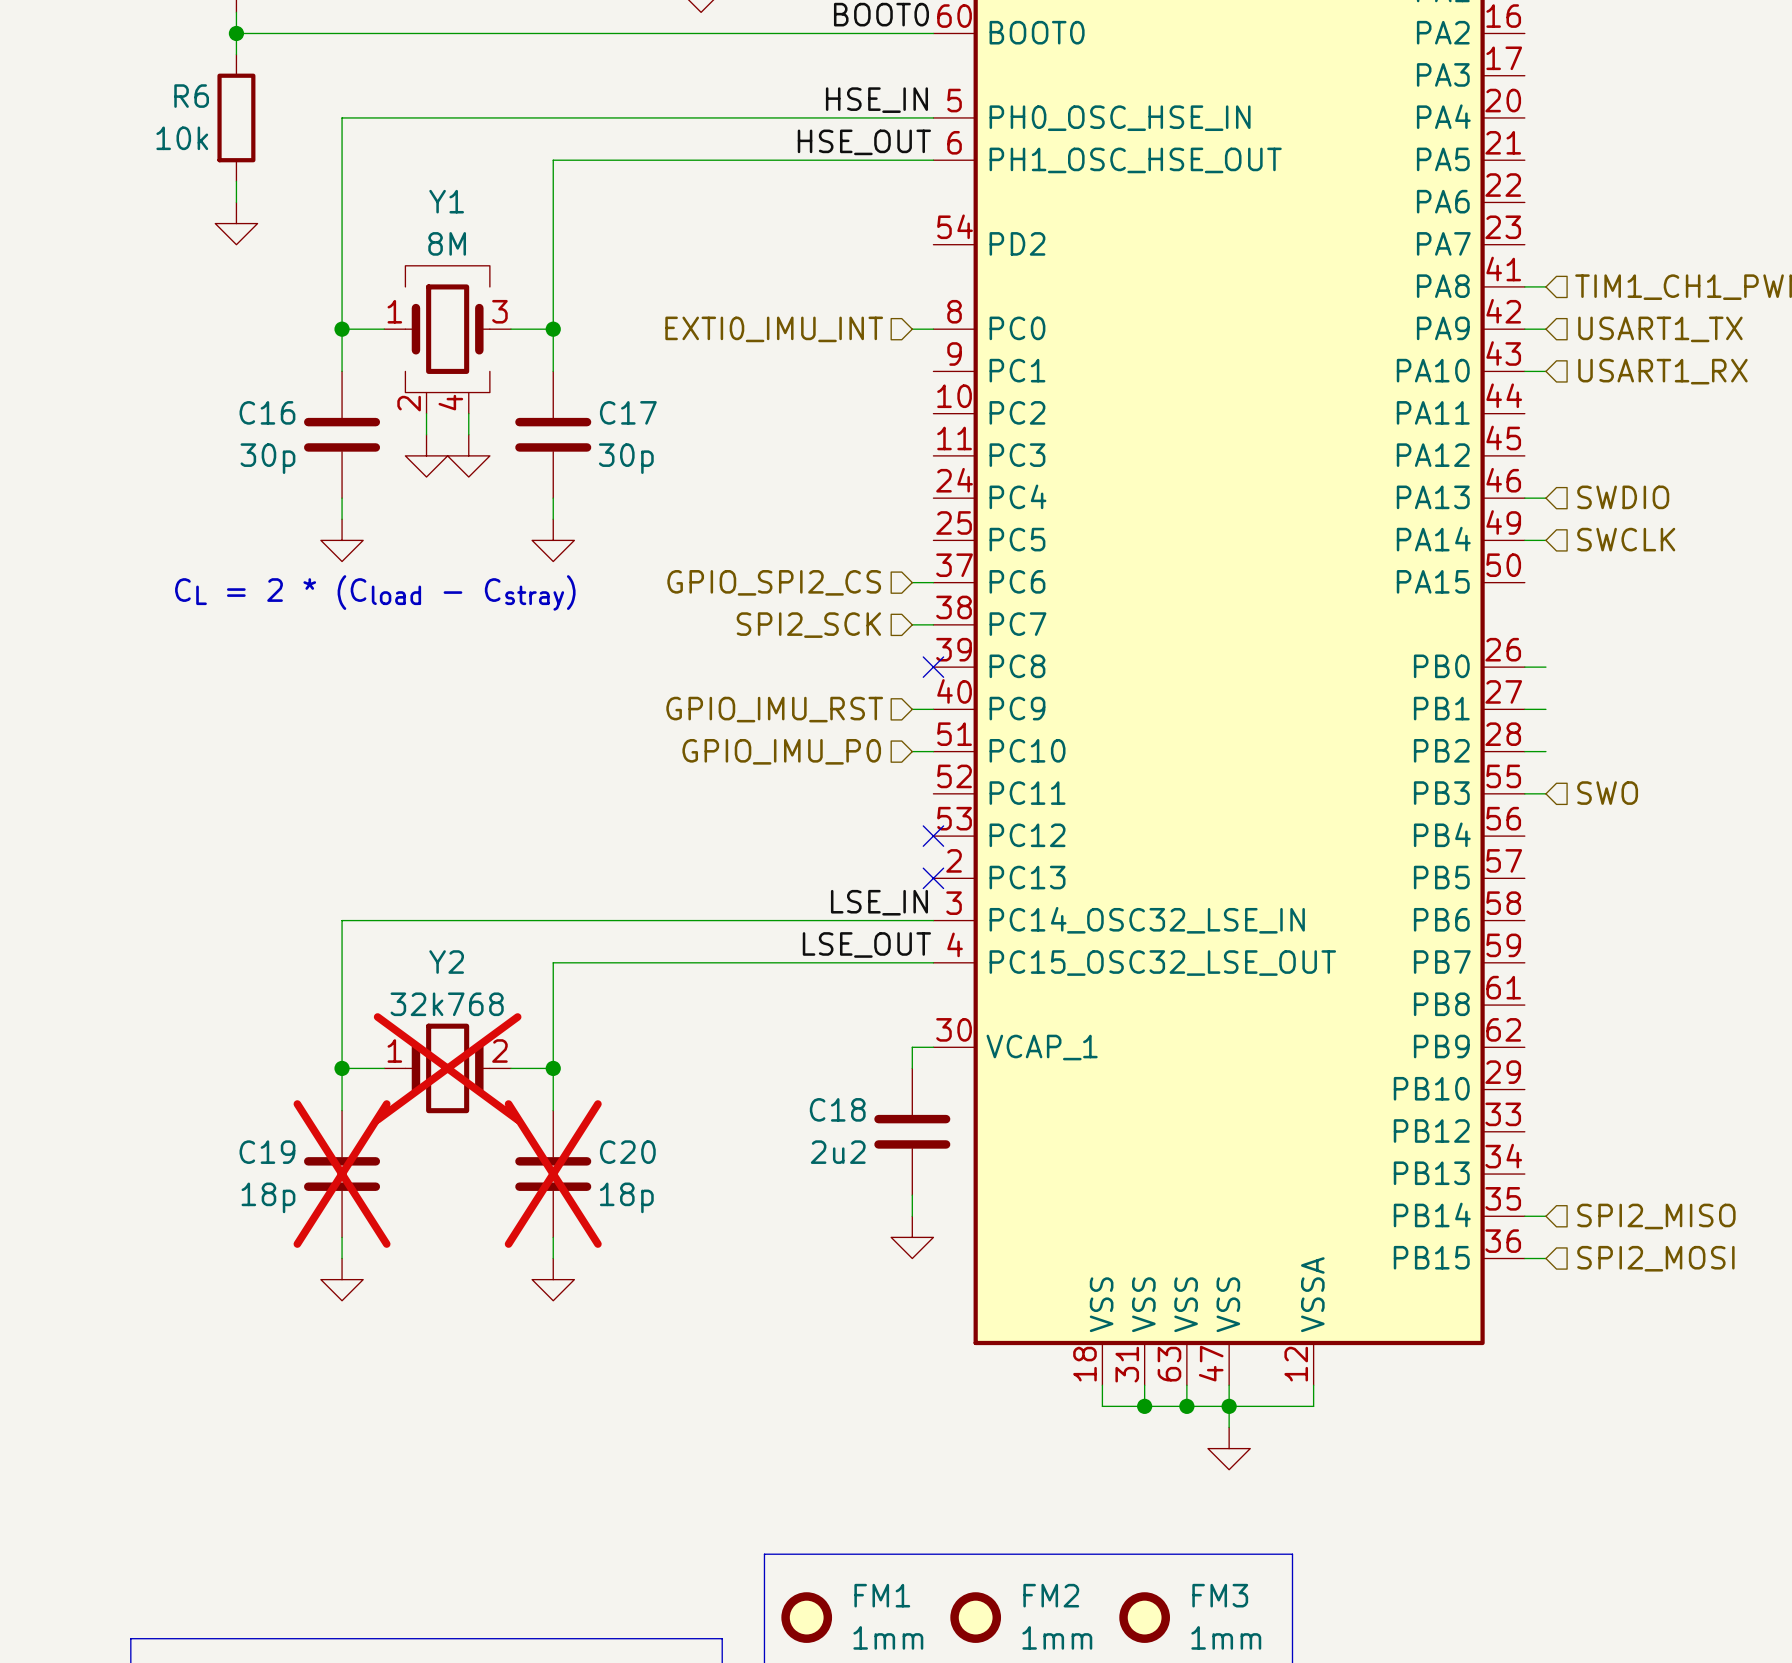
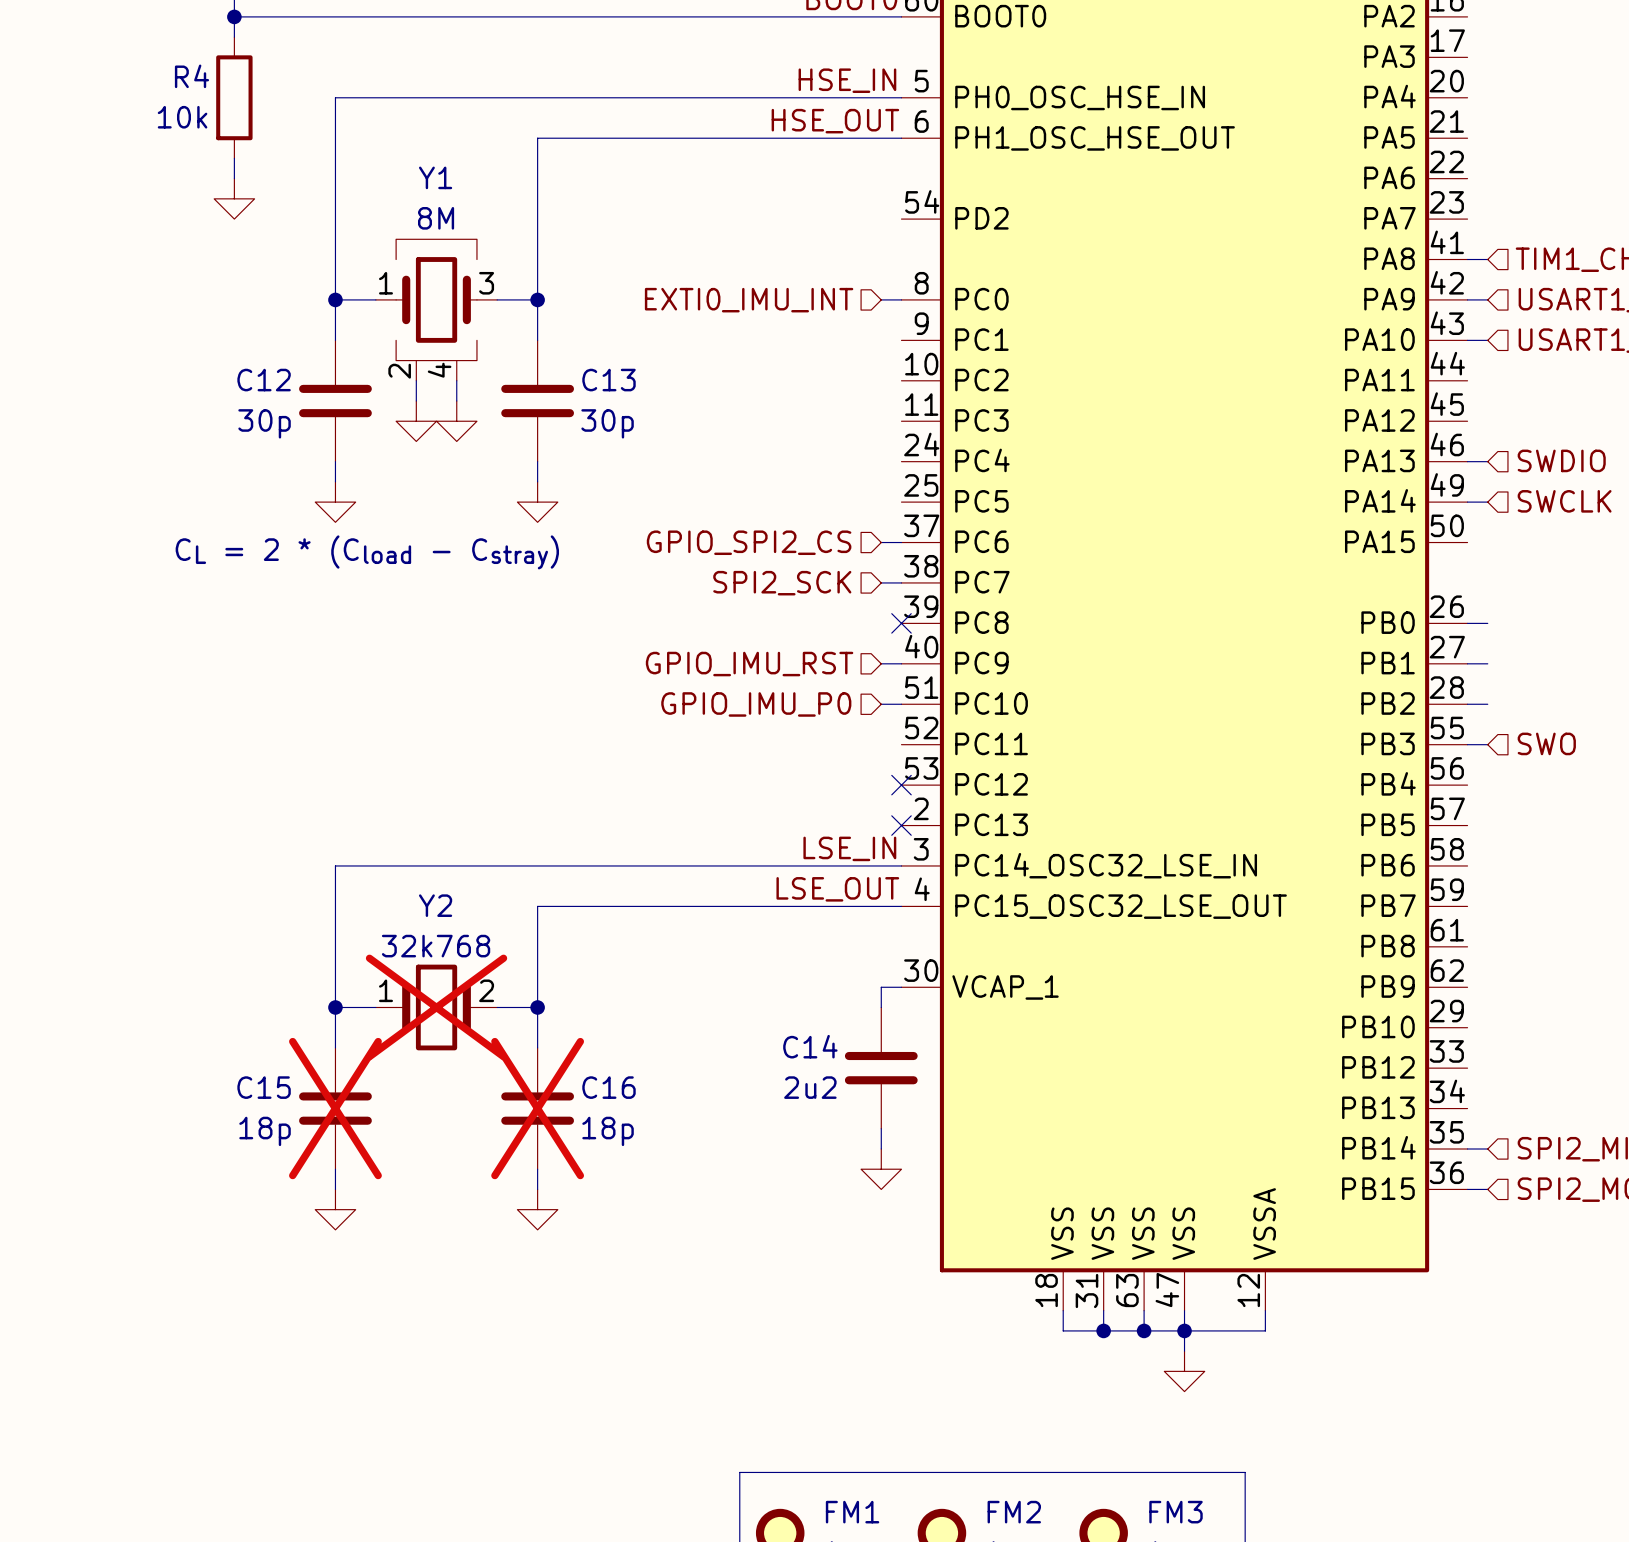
R6 name: R6 (191, 96) -> R4 (191, 76)
C16 name: C16 (267, 412) -> C12 (264, 380)
C17 name: C17 (628, 412) -> C13 (609, 380)
C18 name: C18 (837, 1109) -> C14 (810, 1046)
C19 name: C19 (267, 1152) -> C15 (264, 1087)
C20 name: C20 (627, 1152) -> C16 (609, 1087)

